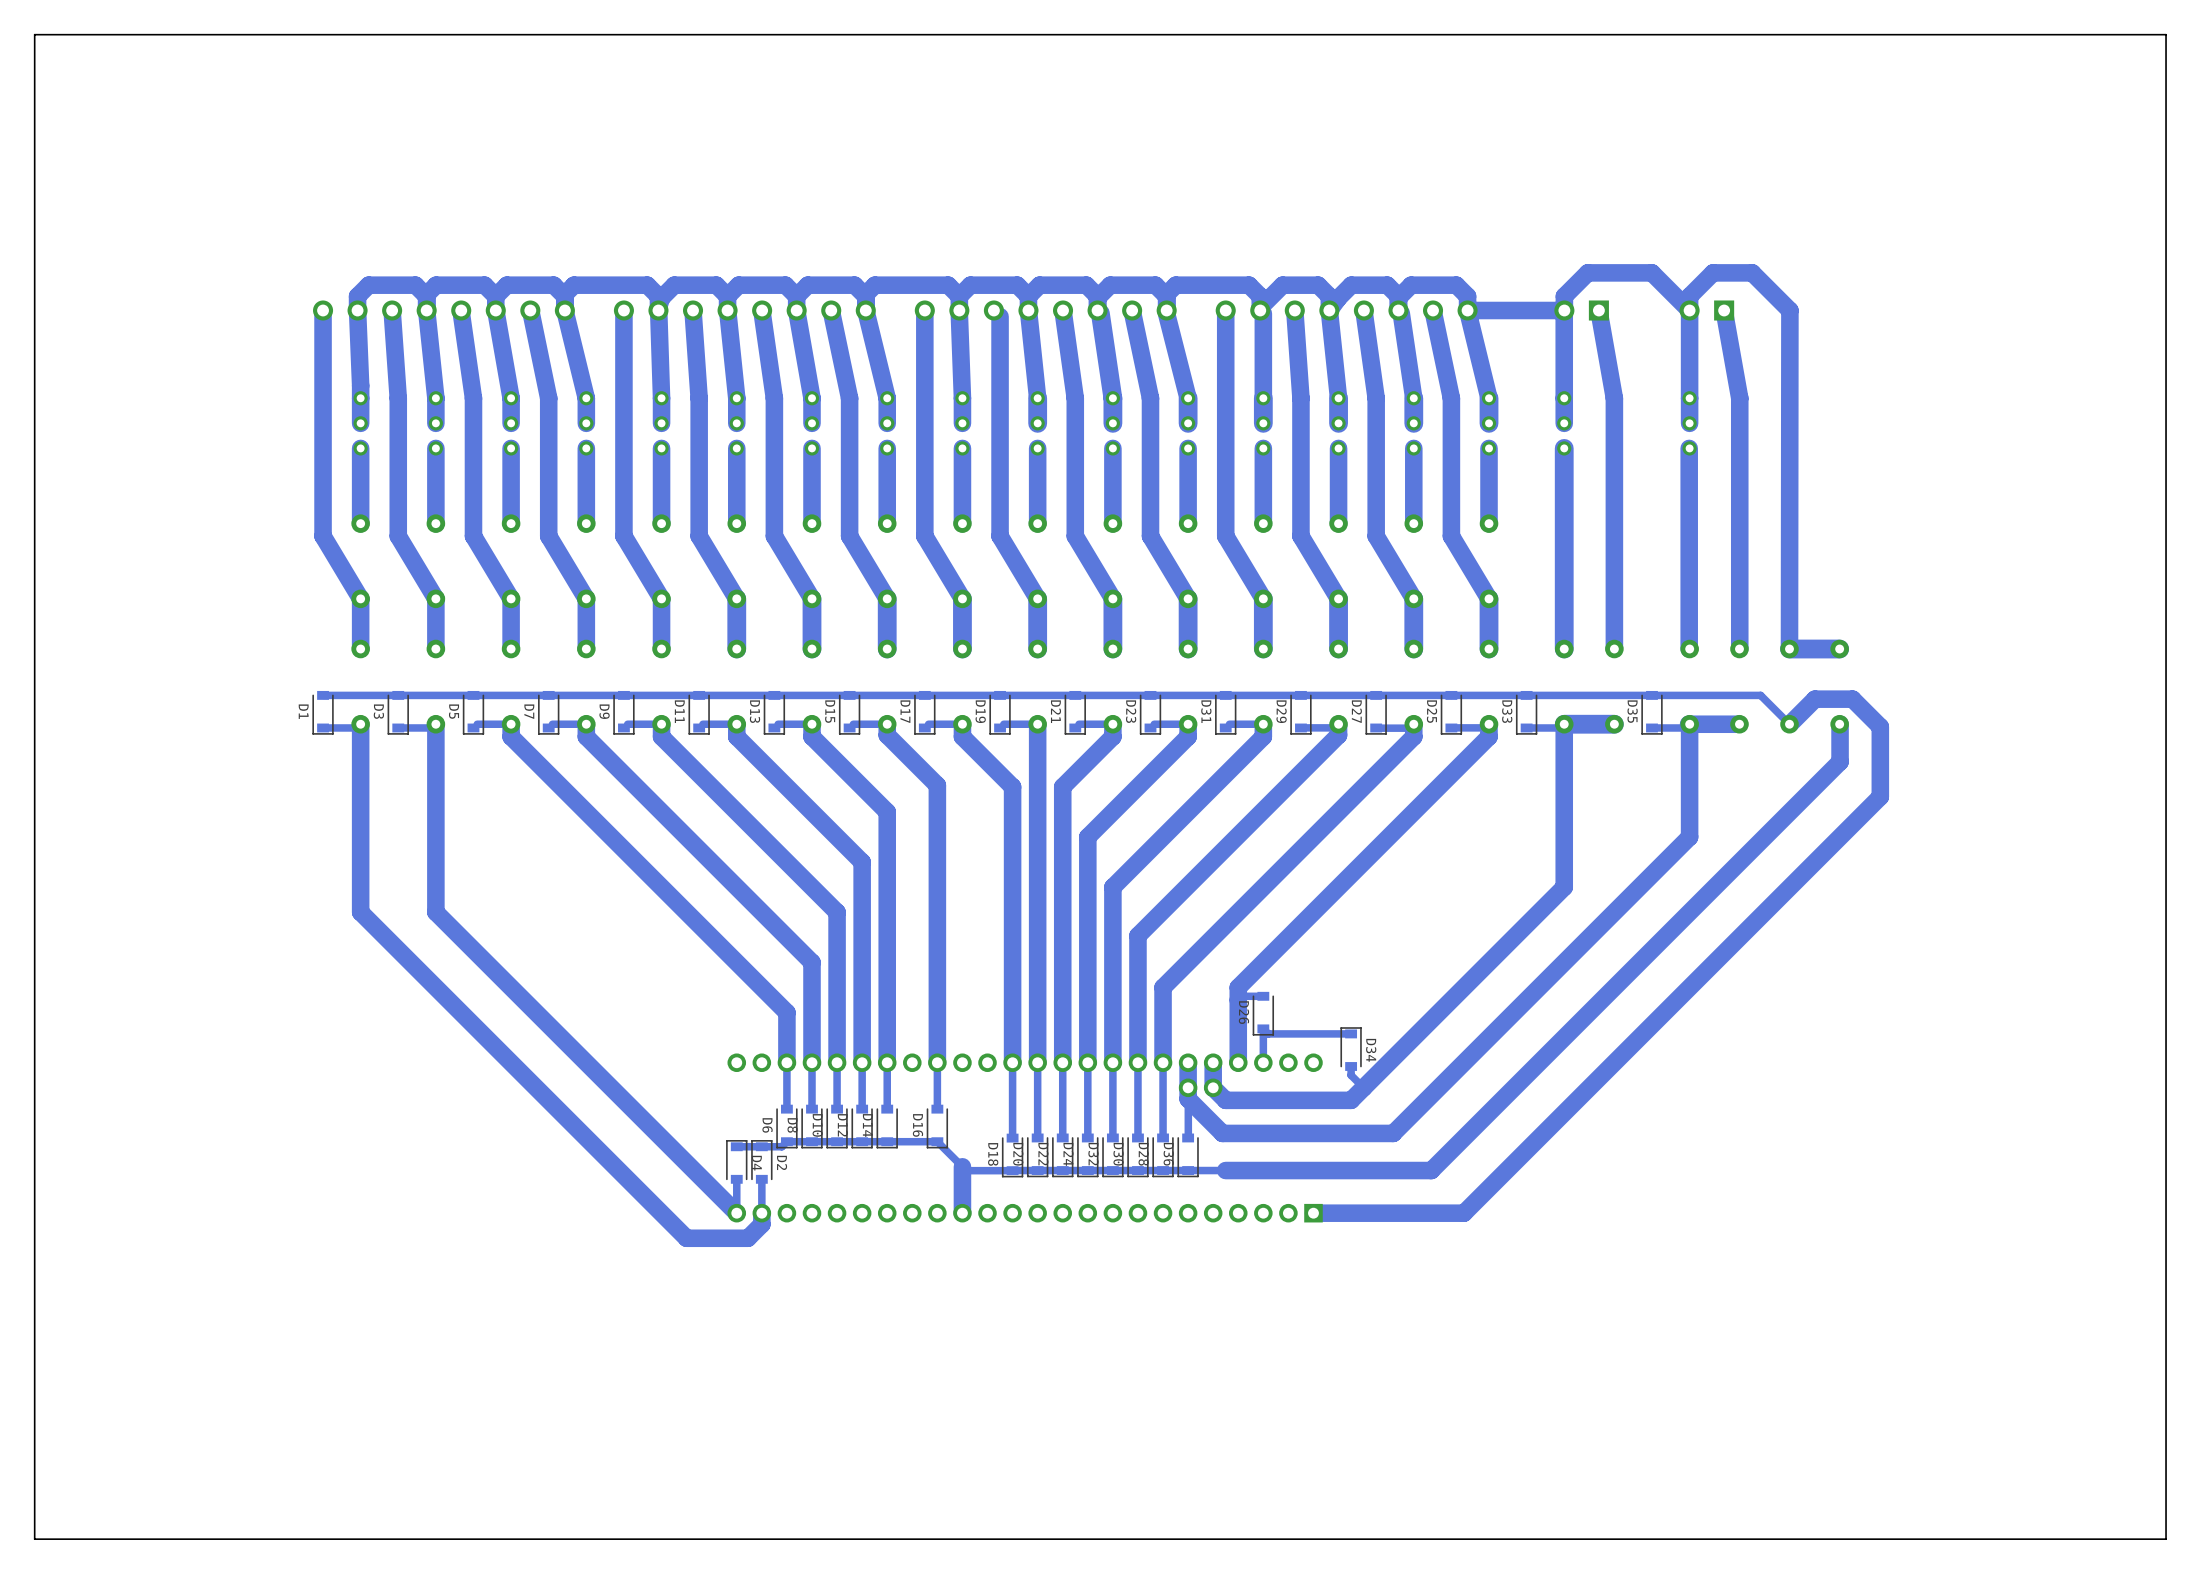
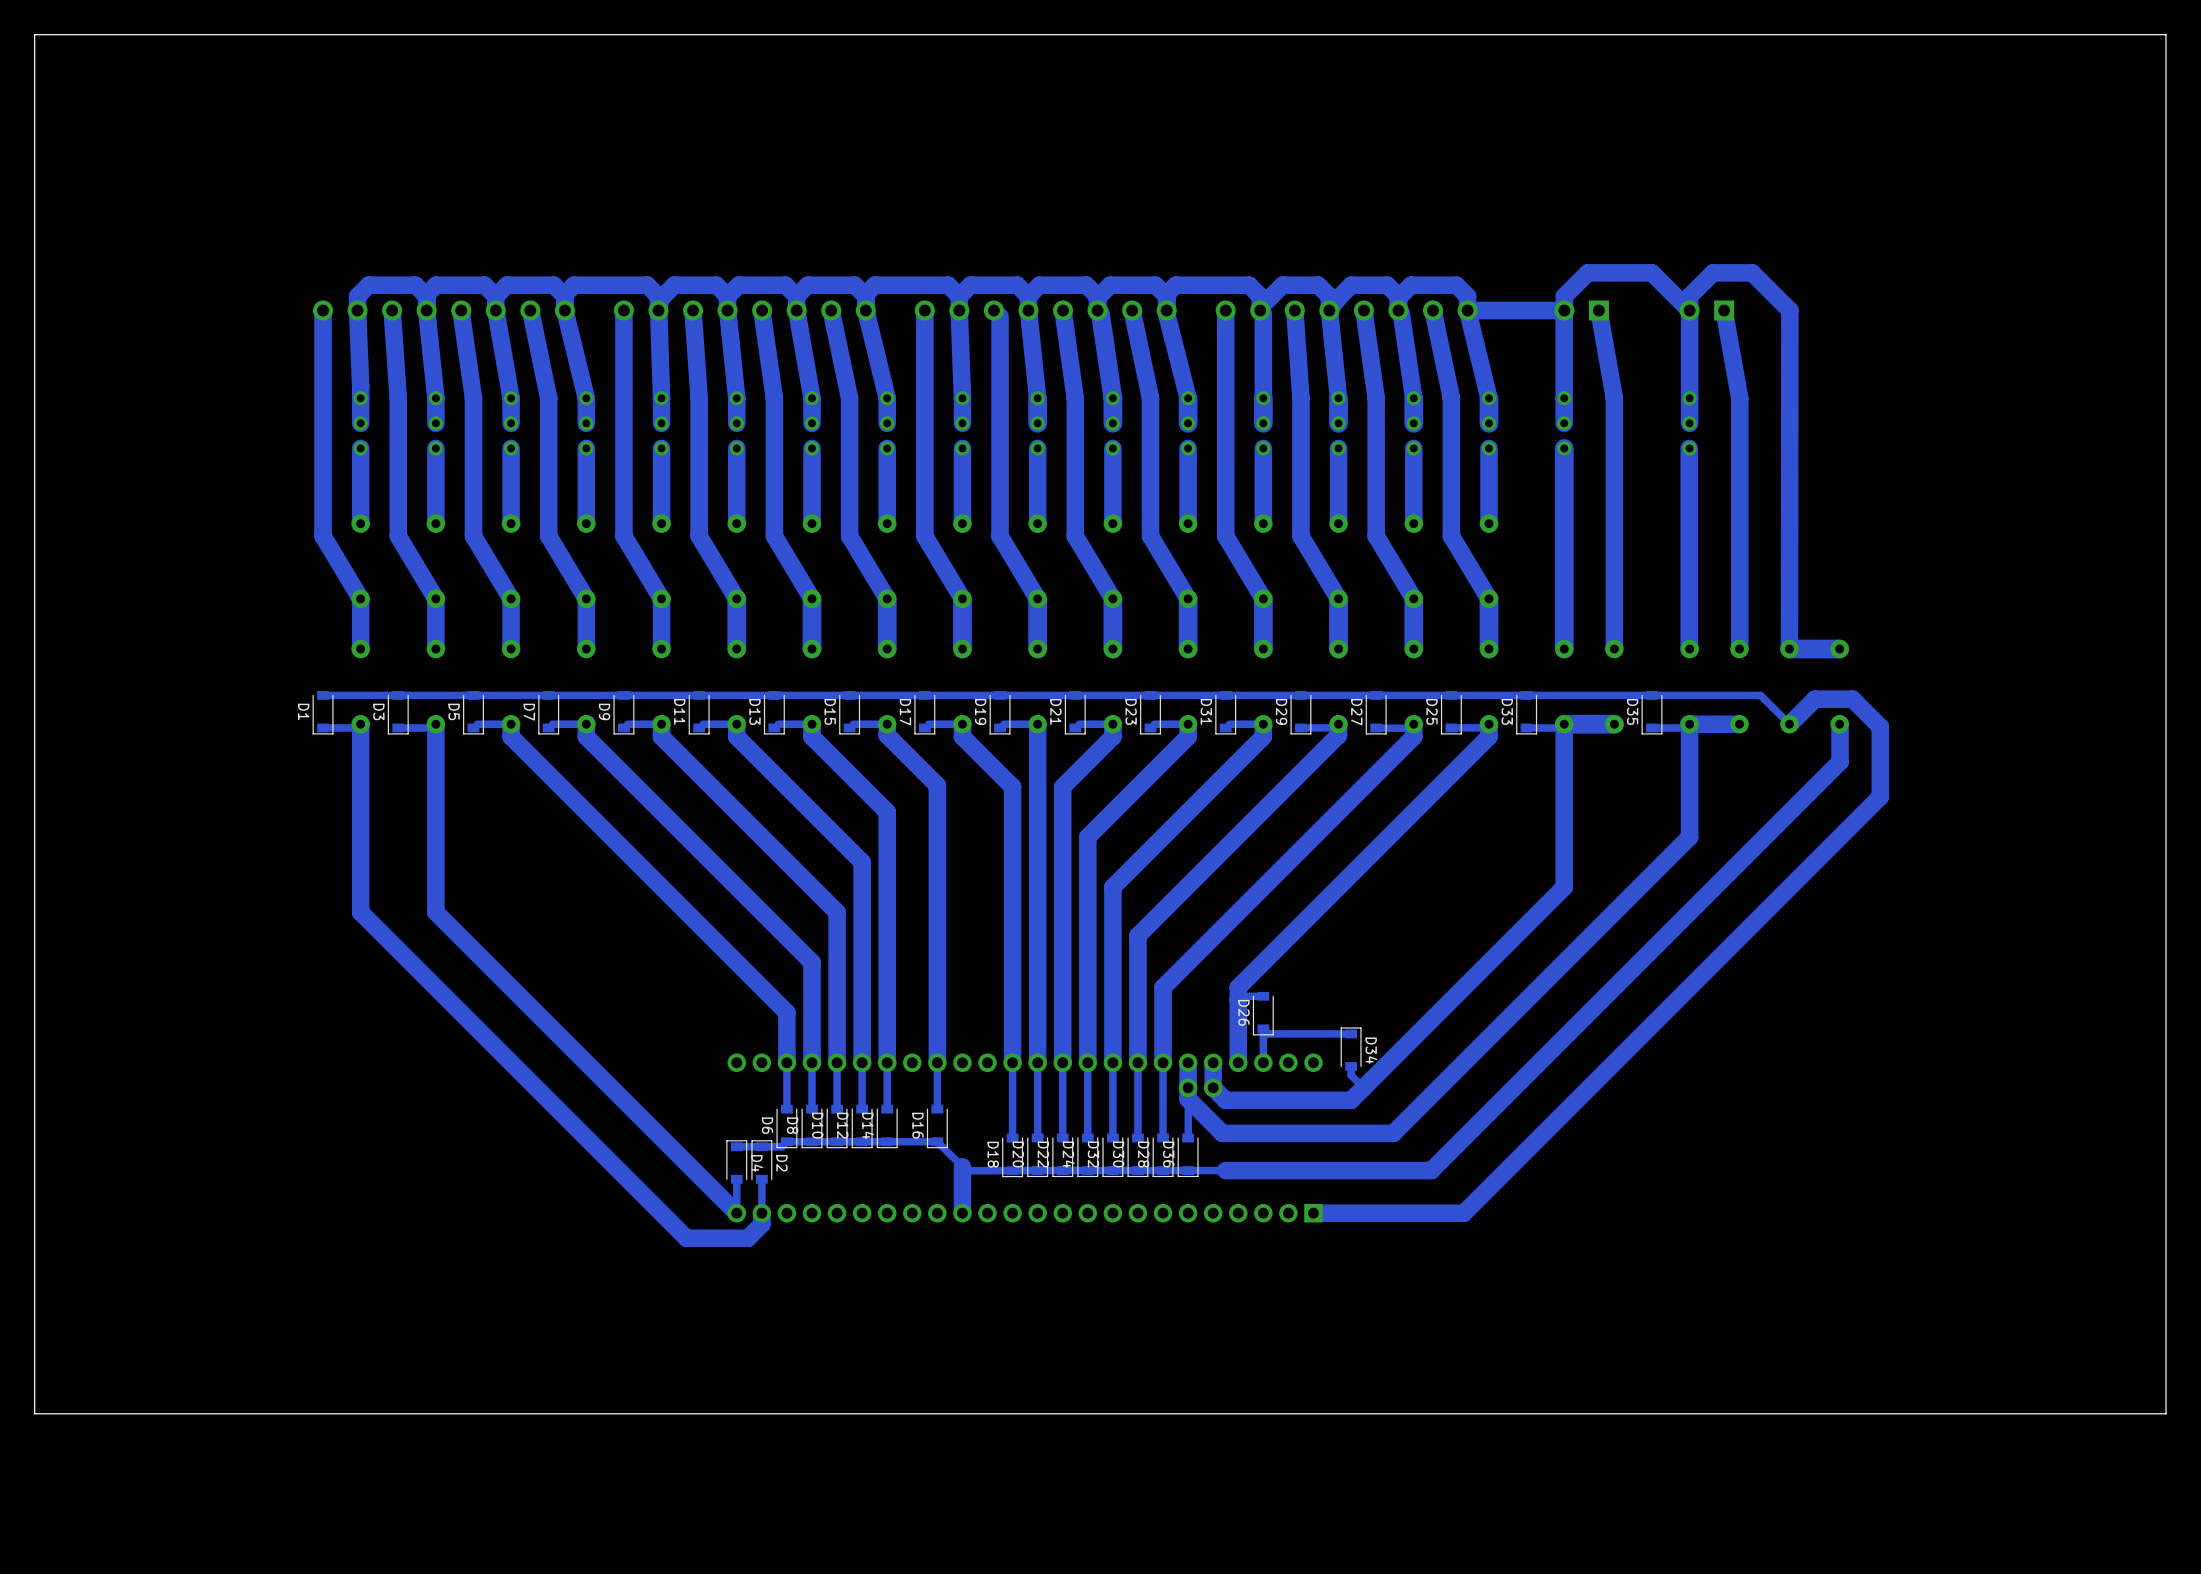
board edge: (2166, 1413) (2166, 1539) (34, 1539) (34, 1413) -> (2166, 1413) (34, 1413)

